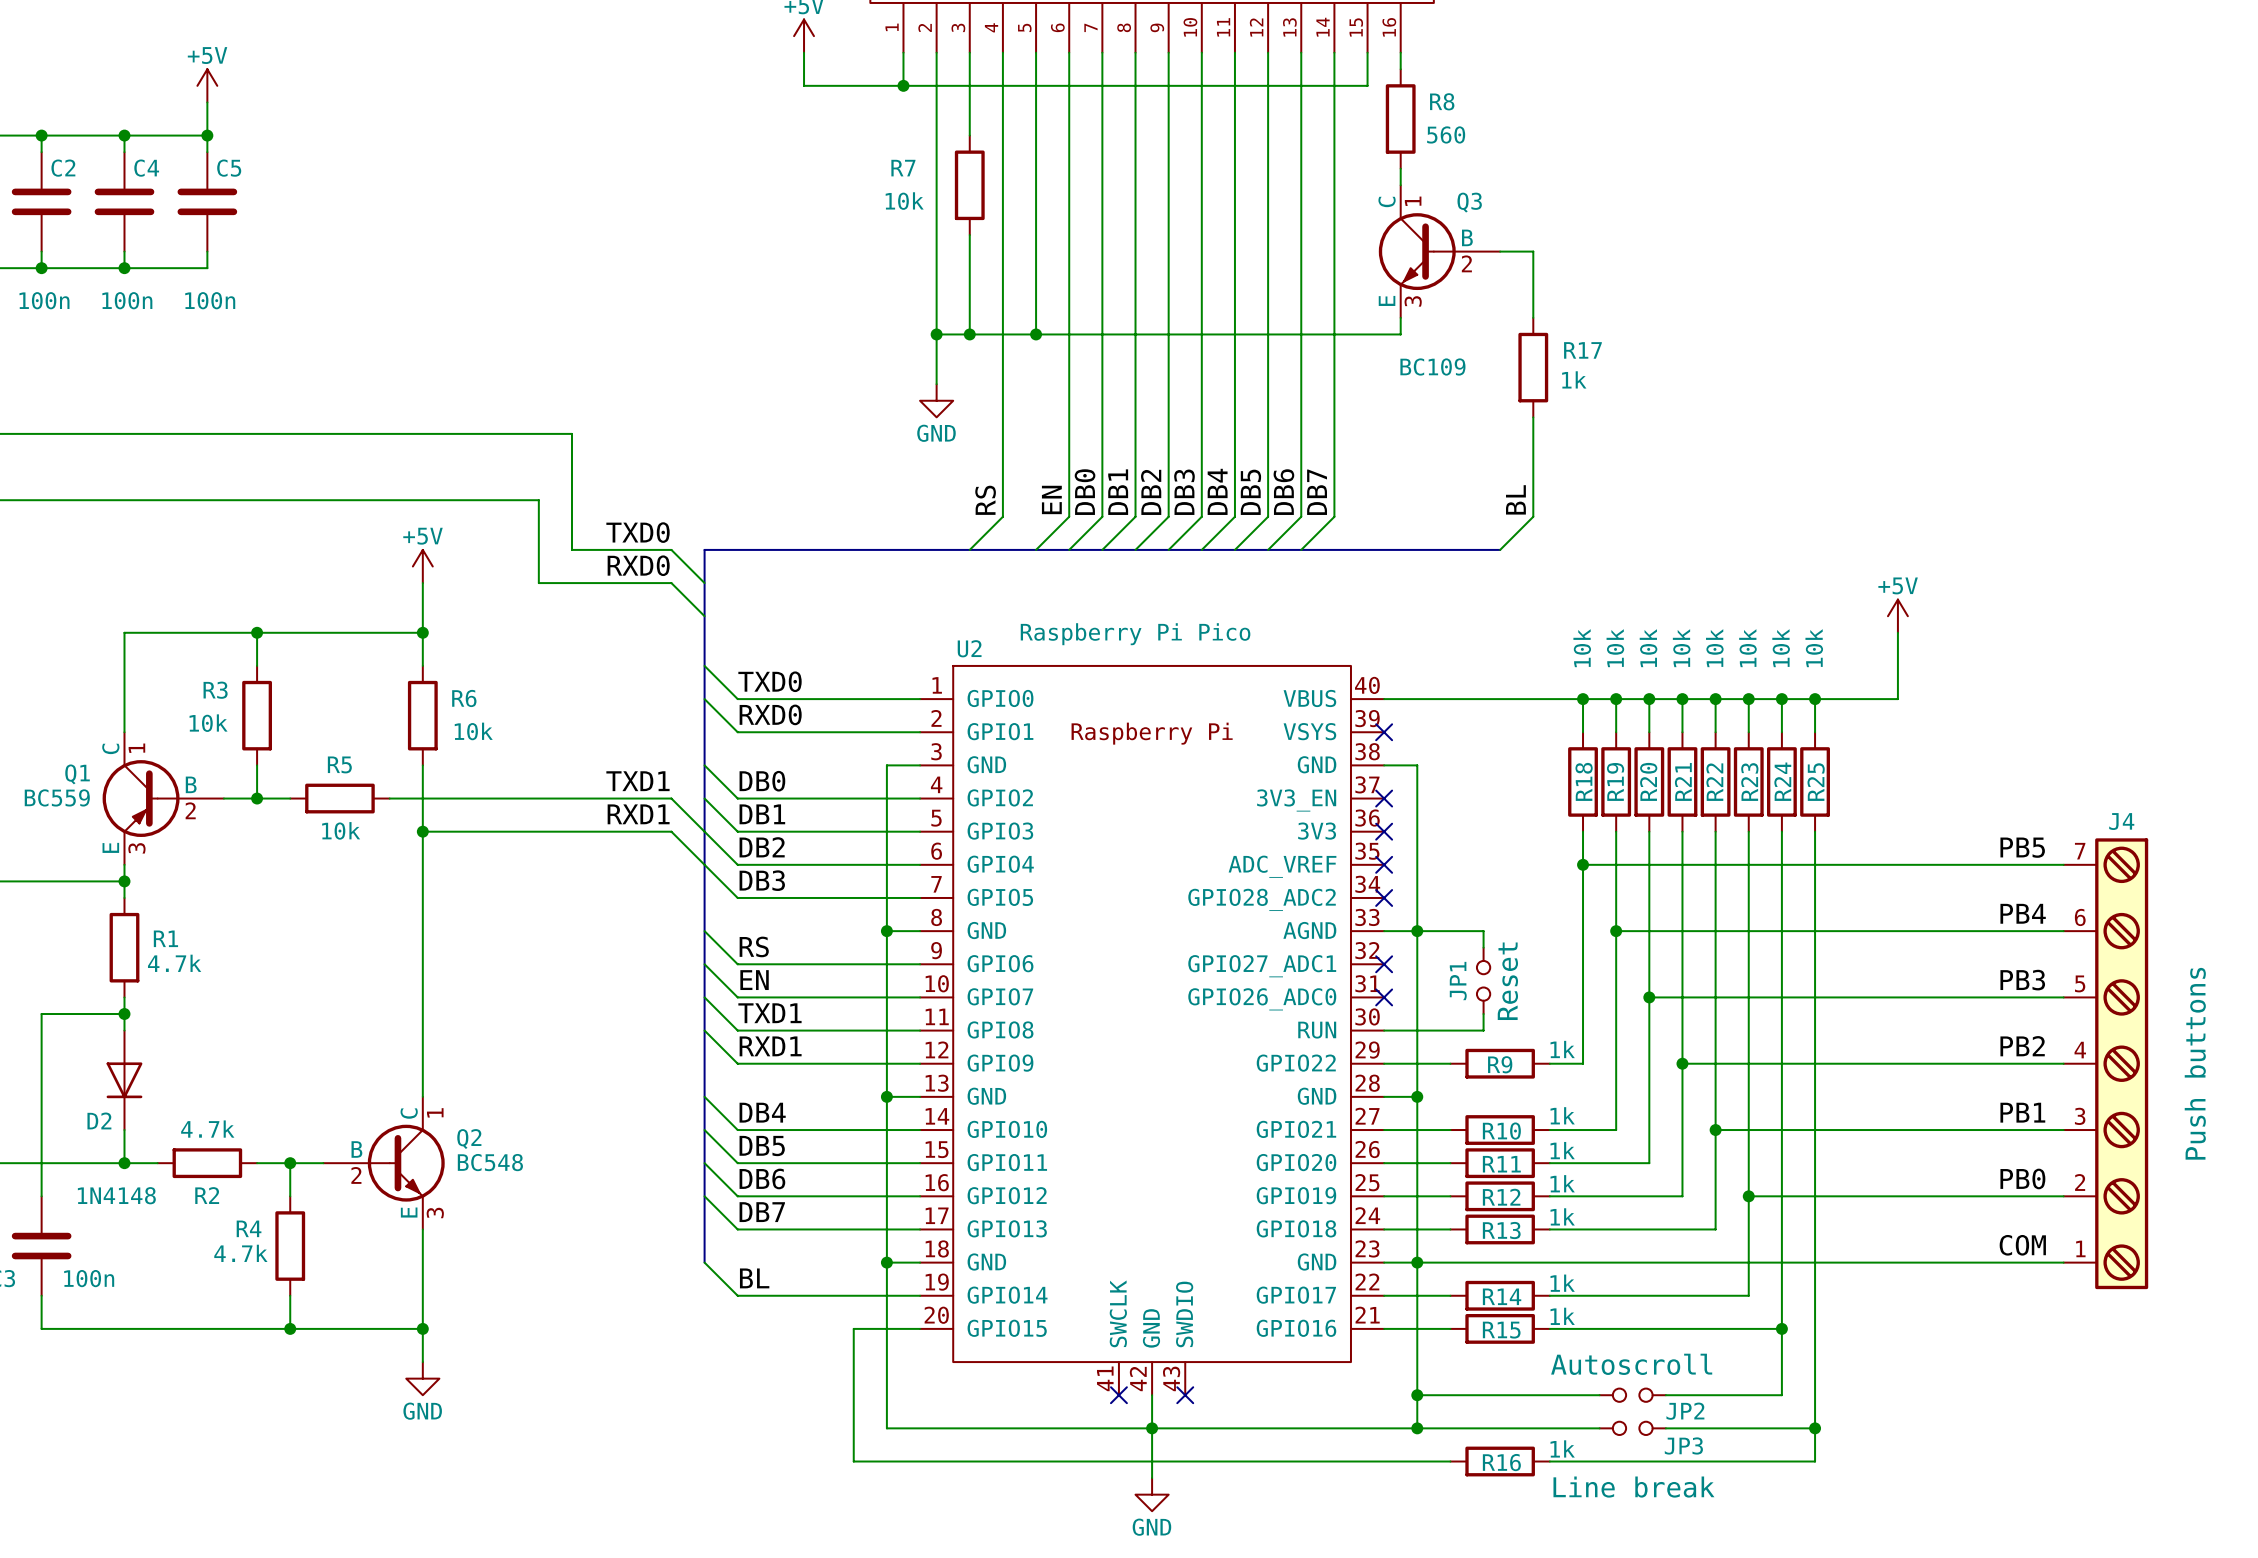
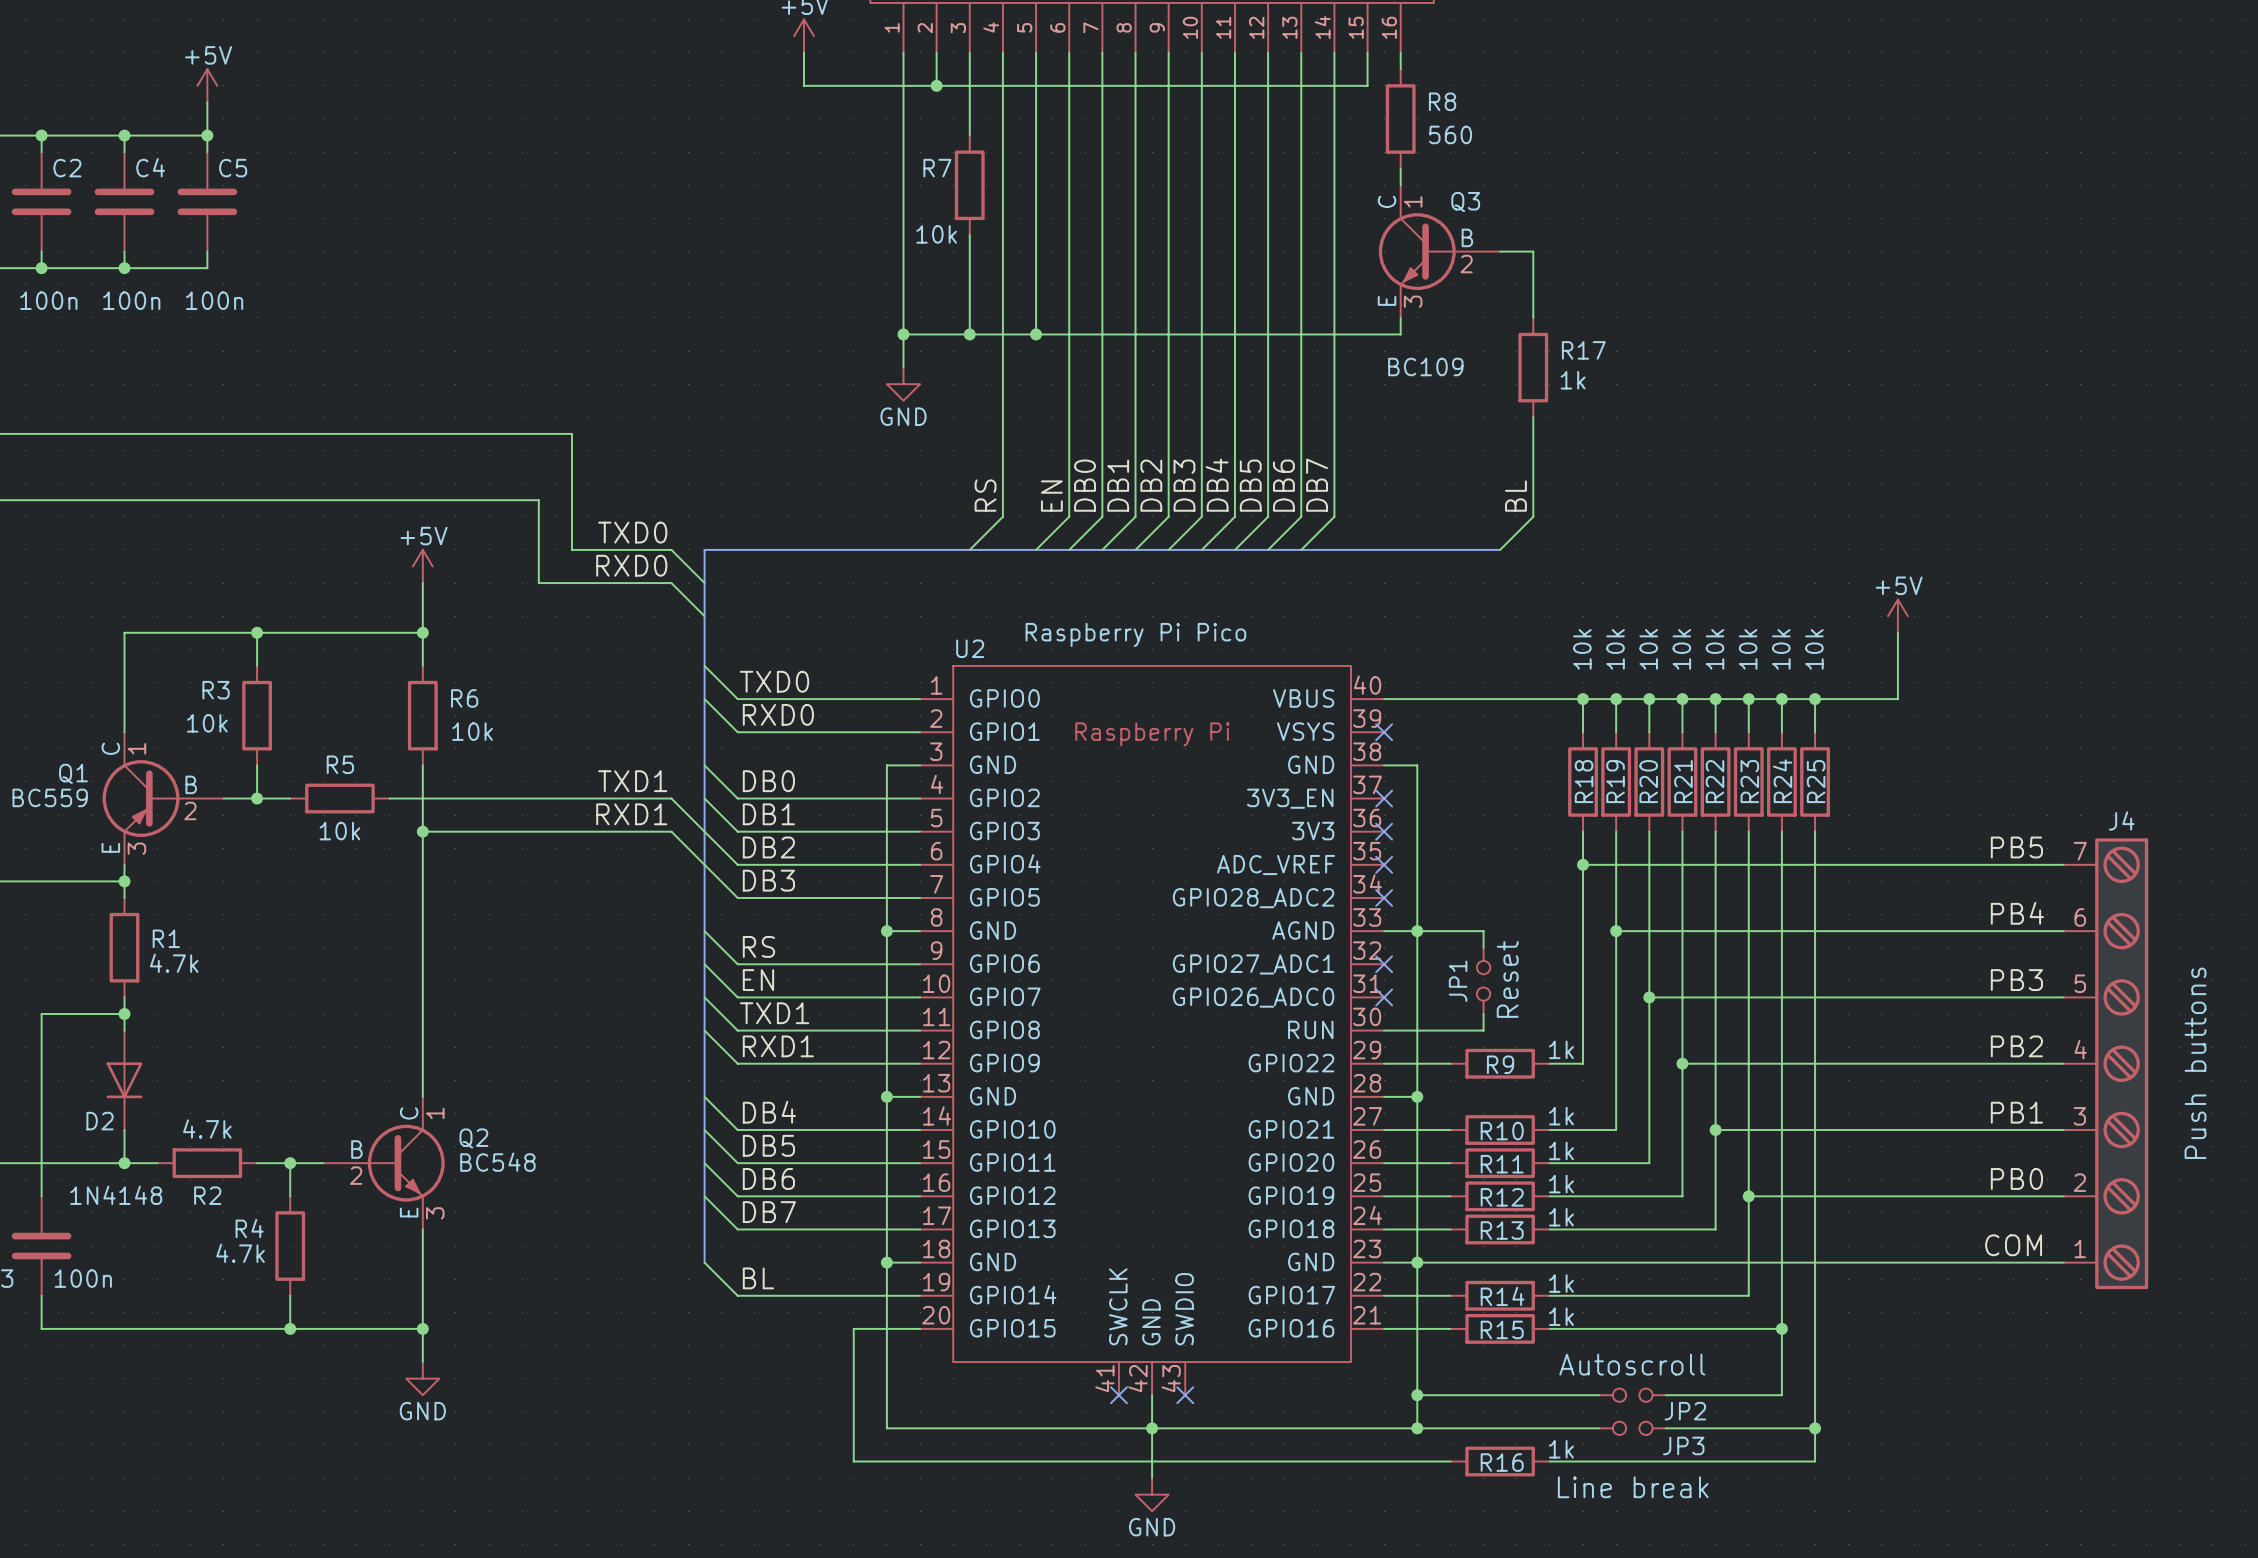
wire: none -> (903, 85) (903, 367)
junction position: (903, 85) -> (936, 85)
wire: (936, 85) (936, 384) -> none
R7 name position: R7 (903, 168) -> R7 (937, 168)
R7 value position: 10k (904, 201) -> 10k (936, 234)
wire: none -> (903, 334) (936, 334)
junction position: (936, 334) -> (903, 334)
power symbol position: GND (936, 400) -> GND (903, 384)

